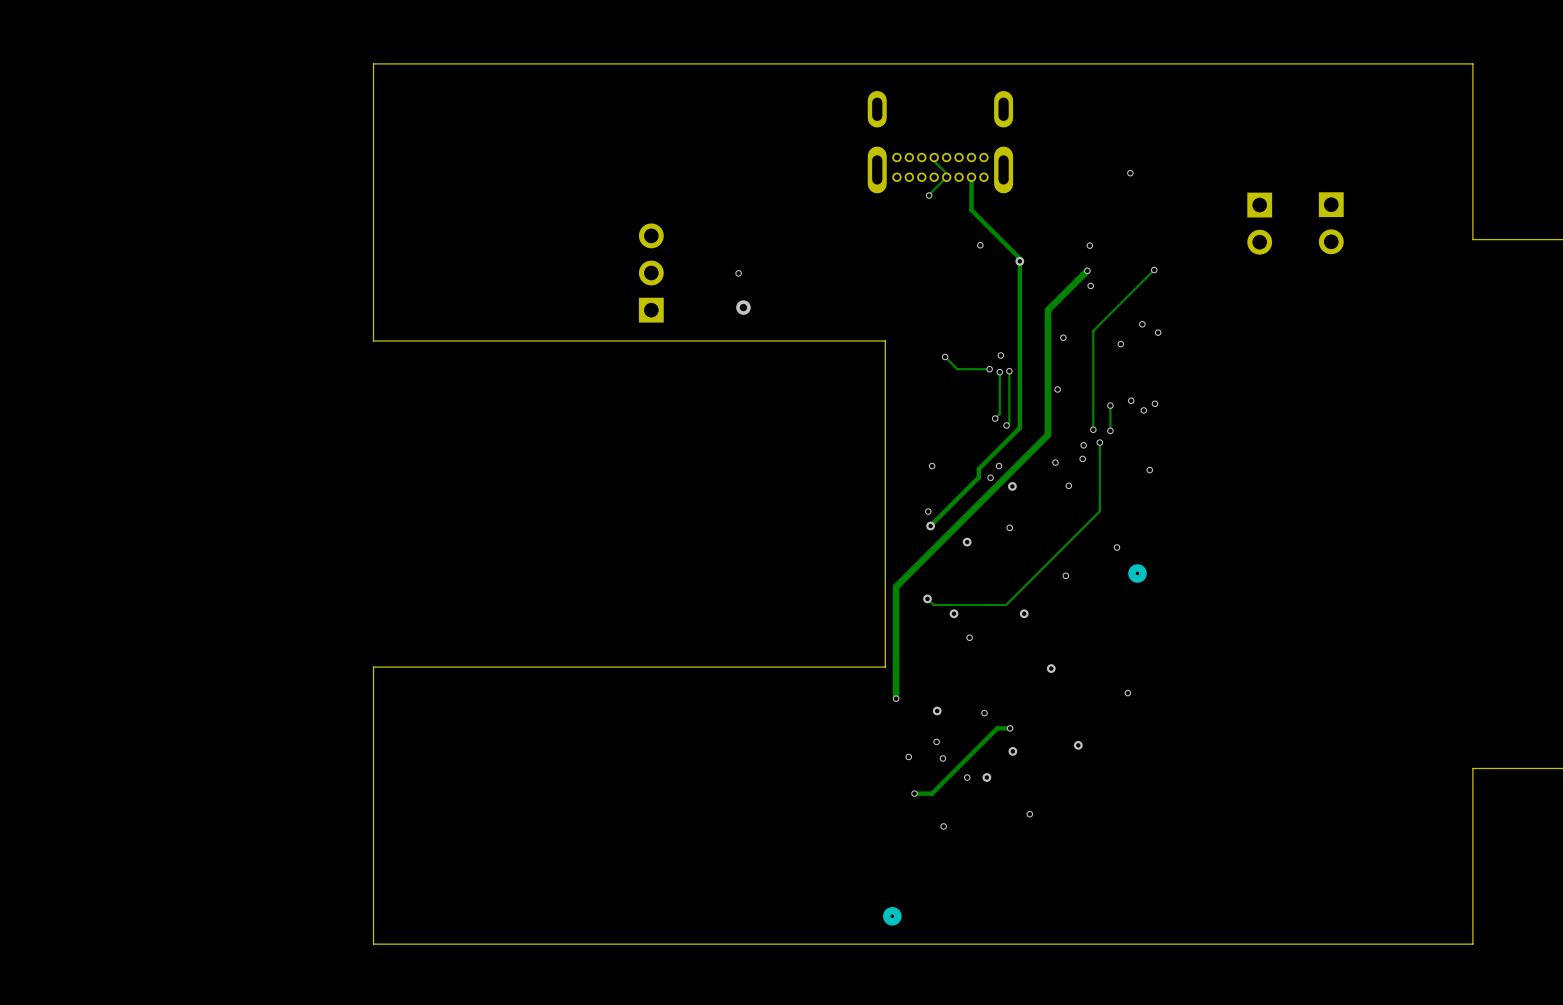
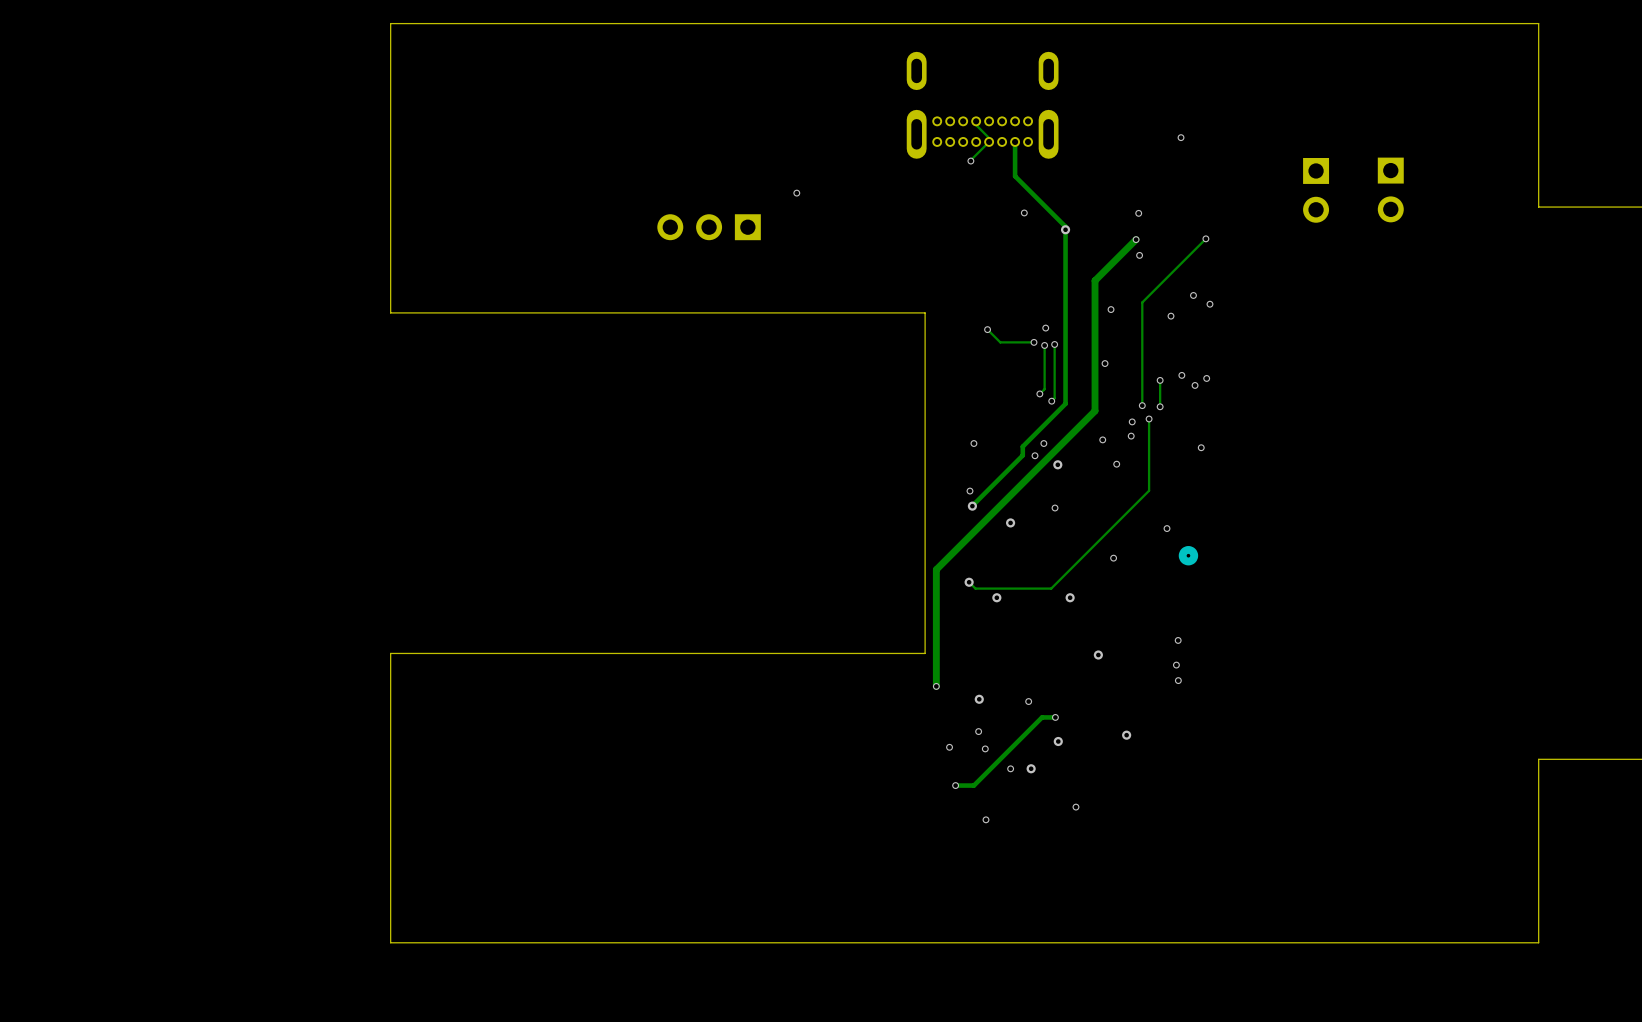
part rotation: 0° (651, 273) -> 90° counterclockwise (709, 227)
via position: (738, 273) -> (796, 193)
via: (743, 307) -> none
via: (969, 637) -> none
via: none -> (1178, 640)
via: none -> (1176, 665)
part: (892, 916) -> none

